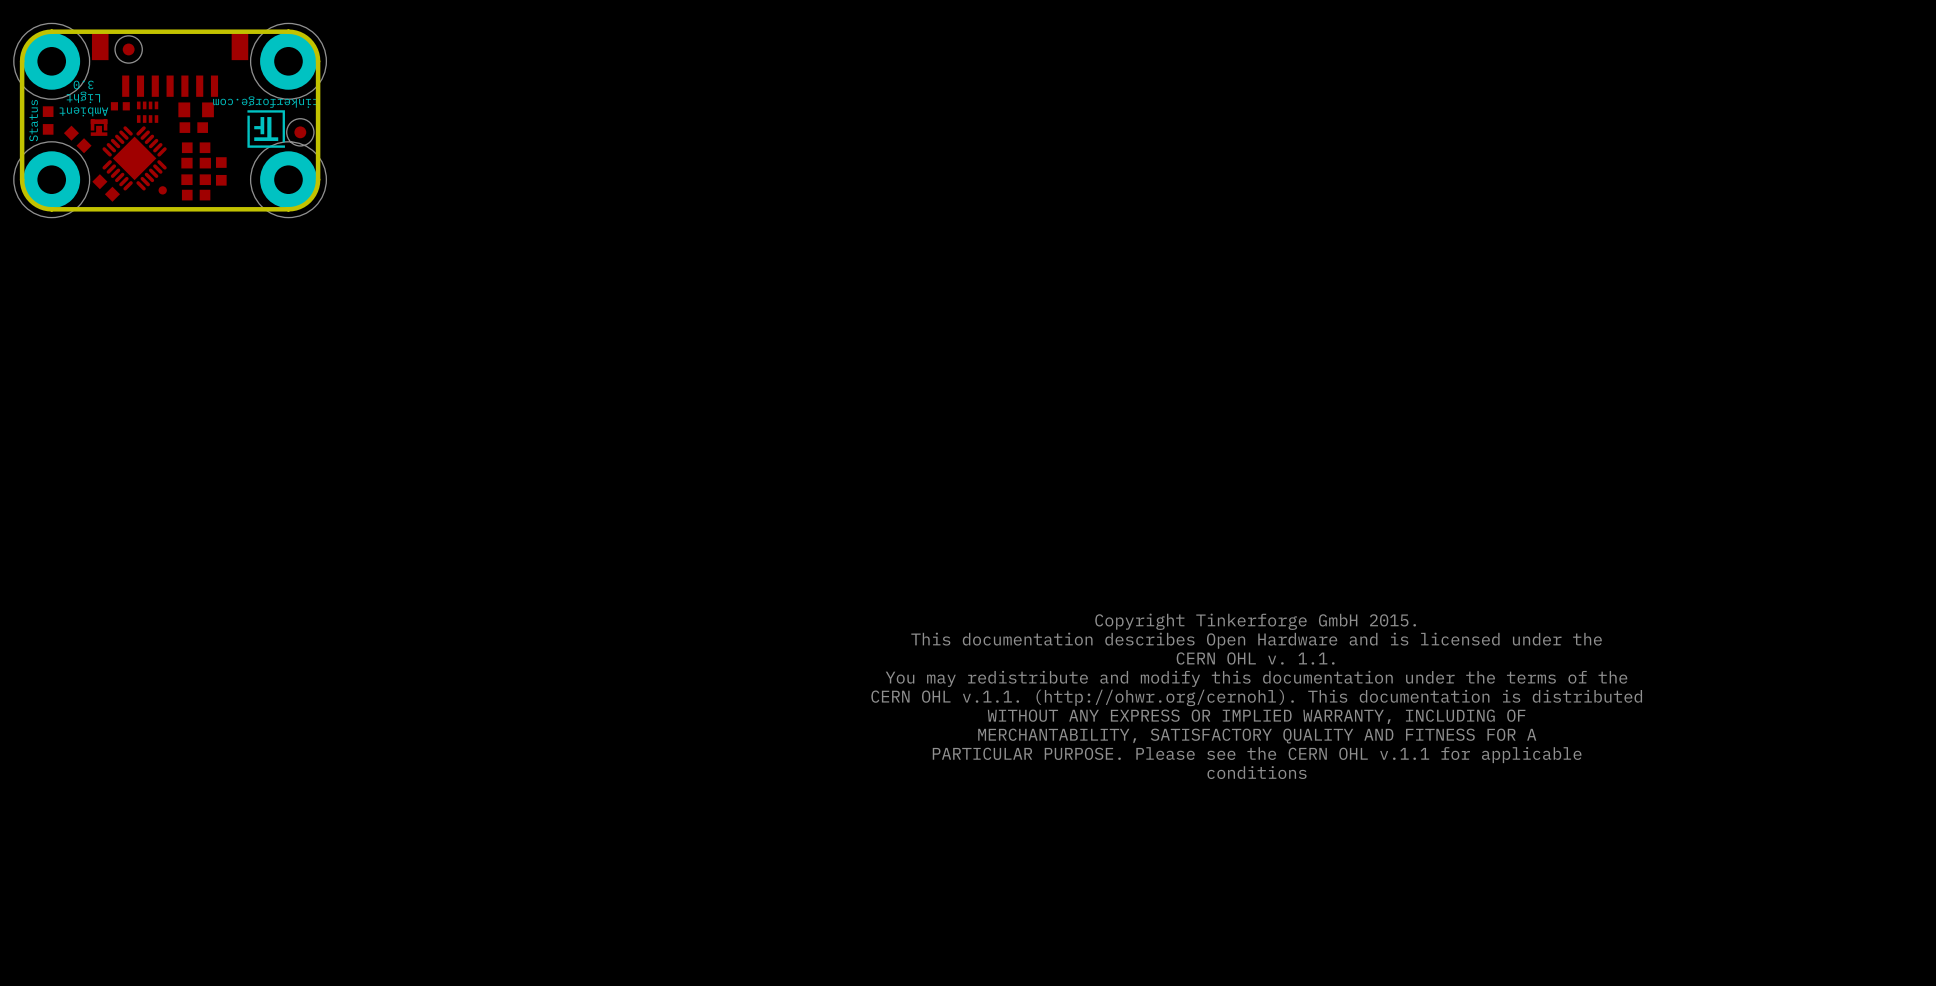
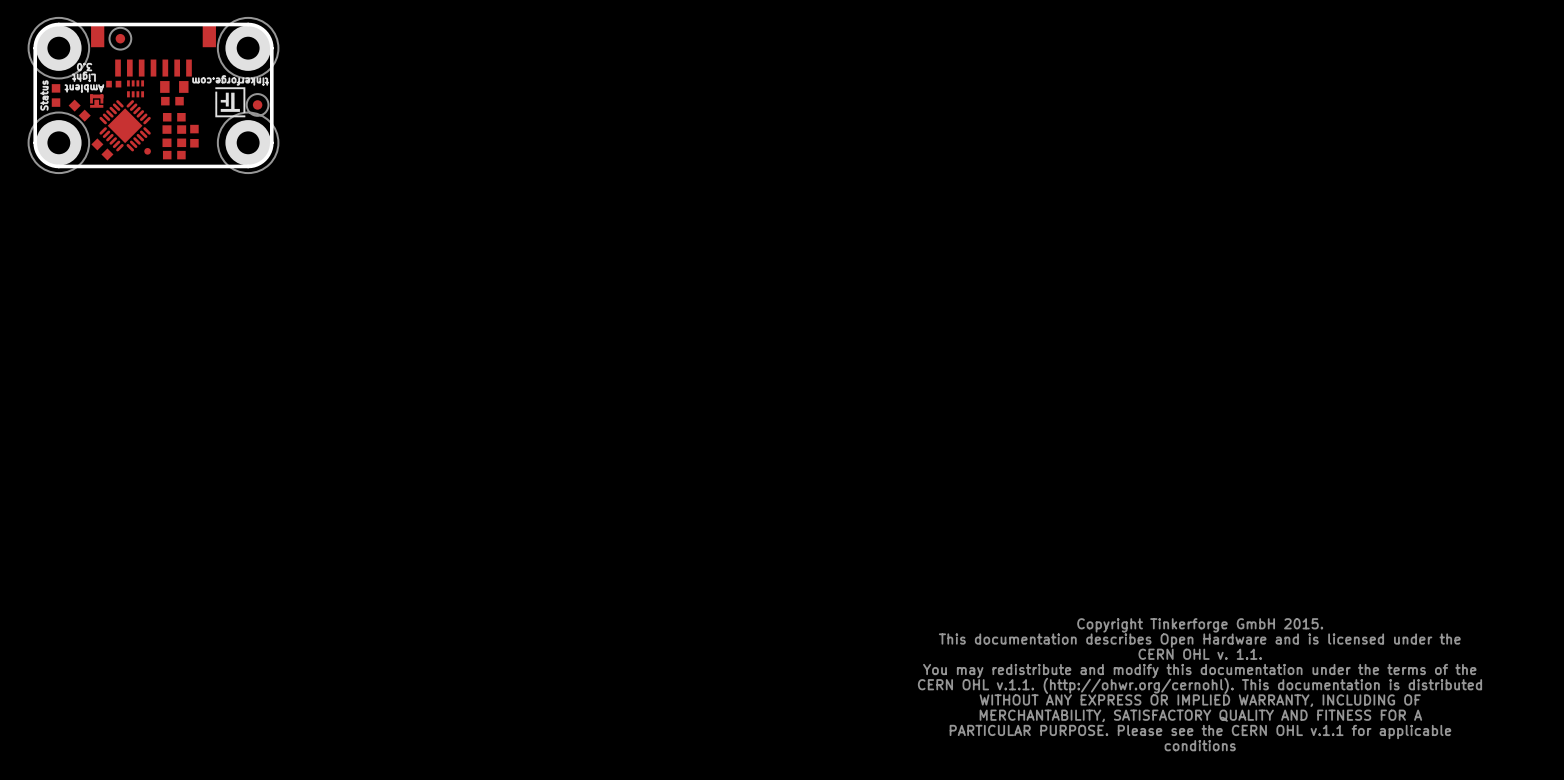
text position: Copyright Tinkerforge GmbH 2015. (1255, 621) -> Copyright Tinkerforge GmbH 2015. (1200, 625)
text position: This documentation describes Open Hardware and is licensed under the (1256, 640) -> This documentation describes Open Hardware and is licensed under the (1199, 640)
text position: CERN OHL v. 1.1. (1255, 658) -> CERN OHL v. 1.1. (1200, 654)
text position: You may redistribute and modify this documentation under the terms of the (1256, 678) -> You may redistribute and modify this documentation under the terms of the (1199, 671)
text position: CERN OHL v.1.1. (http://ohwr.org/cernohl). This documentation is distributed (1256, 697) -> CERN OHL v.1.1. (http://ohwr.org/cernohl). This documentation is distributed (1199, 685)
text position: WITHOUT ANY EXPRESS OR IMPLIED WARRANTY, INCLUDING OF (1256, 716) -> WITHOUT ANY EXPRESS OR IMPLIED WARRANTY, INCLUDING OF (1200, 700)
text position: MERCHANTABILITY, SATISFACTORY QUALITY AND FITNESS FOR A (1257, 736) -> MERCHANTABILITY, SATISFACTORY QUALITY AND FITNESS FOR A (1200, 715)
text position: PARTICULAR PURPOSE. Please see the CERN OHL v.1.1 for applicable (1257, 755) -> PARTICULAR PURPOSE. Please see the CERN OHL v.1.1 for applicable (1200, 732)
text position: conditions (1257, 772) -> conditions (1200, 745)

